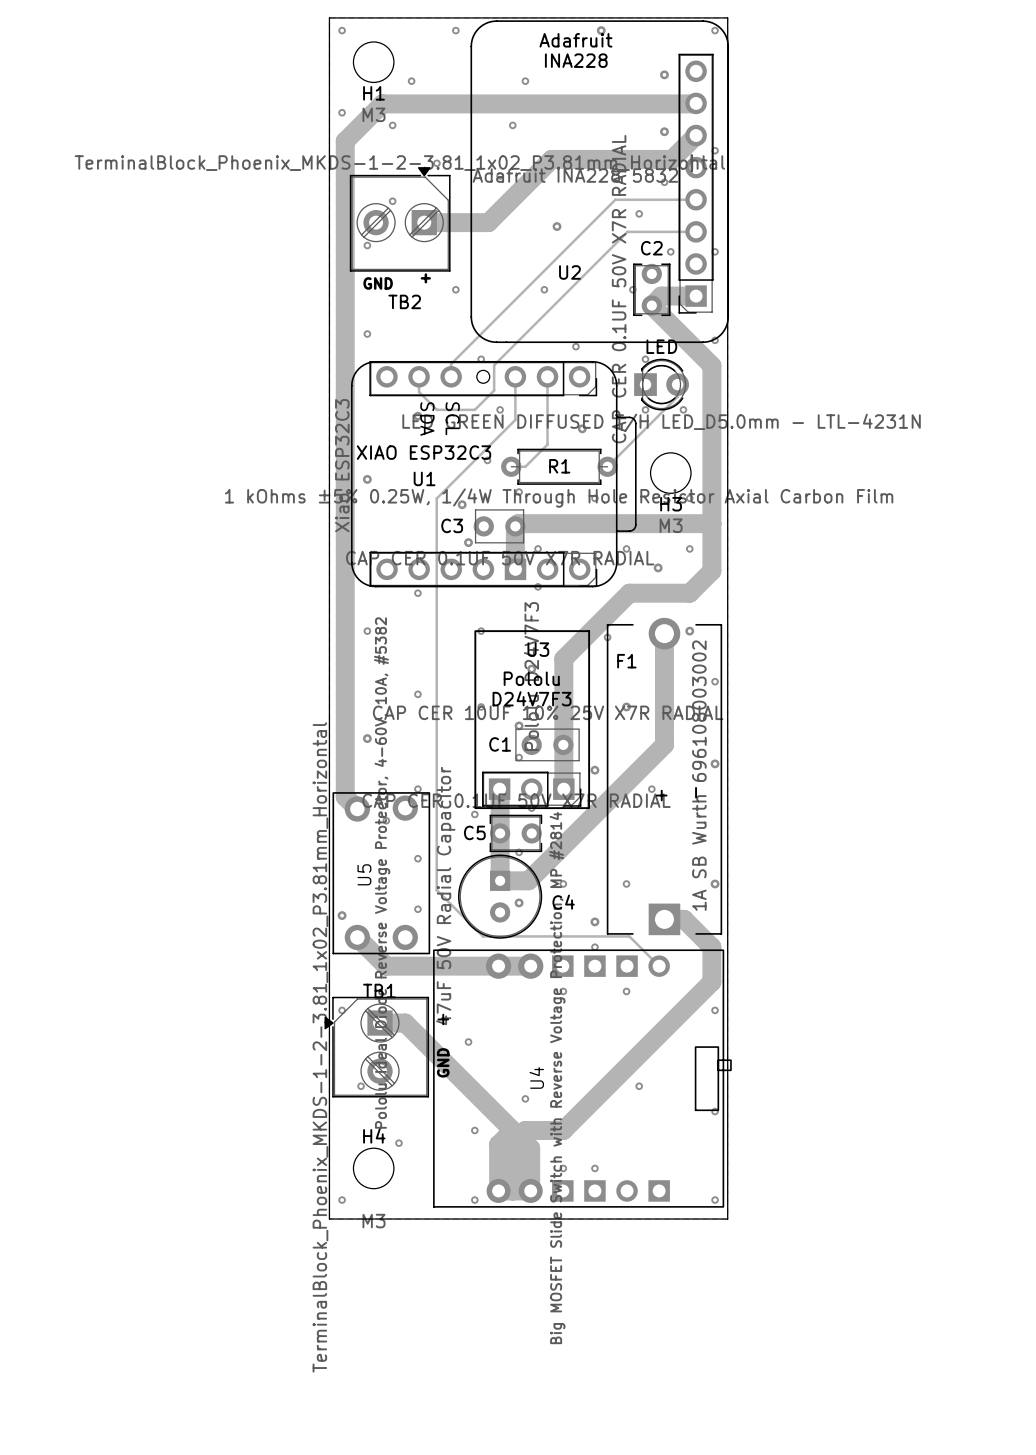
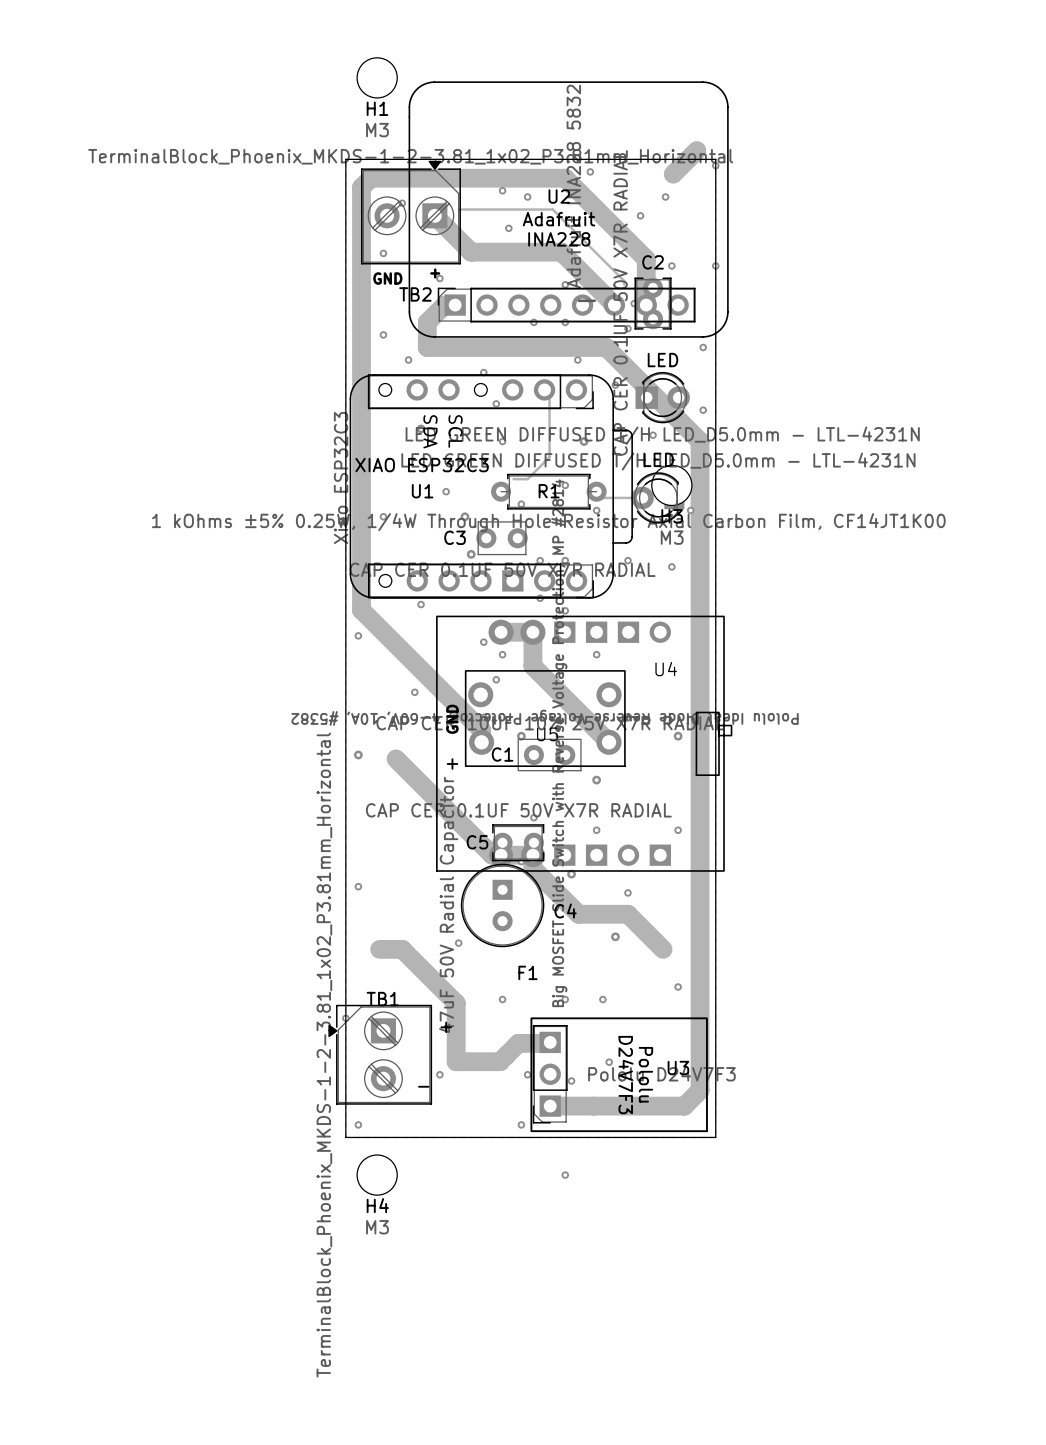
board edge: (329, 17) (727, 17) (727, 1219) (329, 1219) (329, 17) -> (345, 159) (345, 1137) (715, 1137) (715, 159) (345, 159)
via: (342, 30) -> none
via: (455, 30) -> none
via: (601, 30) -> none
via: (715, 30) -> none
text position: Adafruit (575, 40) -> Adafruit (559, 219)
text position: INA228 (576, 60) -> INA228 (559, 239)
via: (664, 74) -> none
via: (411, 81) -> none
via: (525, 81) -> none
track: (695, 103) (382, 103) (345, 141) (345, 796) (357, 809) -> none
via: (342, 112) -> none
via: (392, 125) -> none
via: (512, 125) -> none
via: (664, 131) -> none
via: none -> (590, 171)
track: (672, 159) (551, 159) (488, 222) (424, 222) -> none
via: (436, 163) -> none
U2 rotation: 0° (599, 181) -> 90° clockwise (568, 209)
via: none -> (527, 197)
track: none -> (458, 209) (552, 209) (624, 281) (624, 284)
track: (696, 199) (615, 199) (451, 364) (451, 376) -> none
via position: (392, 201) -> (402, 203)
track: none -> (434, 215) (471, 252) (561, 252) (614, 305)
via: none -> (508, 228)
via position: (639, 213) -> (640, 215)
TB2 position: (400, 219) -> (410, 212)
via: (557, 226) -> none
track: (696, 231) (627, 231) (494, 365) (494, 390) (474, 409) (436, 409) (419, 392) (419, 376) -> none
via position: (367, 245) -> (383, 253)
via: none -> (565, 284)
U2 name position: U2 (569, 272) -> U2 (559, 196)
text position: + (425, 278) -> + (435, 273)
text position: GND (378, 283) -> GND (387, 278)
via position: (455, 289) -> (439, 278)
via: (544, 289) -> none
track: none -> (455, 305) (444, 305) (427, 322) (427, 347) (606, 347) (700, 441) (700, 1090) (684, 1106) (550, 1106)
track: none -> (646, 305) (646, 259) (565, 178) (370, 178) (361, 187) (361, 610) (481, 730) (481, 742)
track: (696, 296) (661, 296) (651, 305) (711, 365) (711, 571) (689, 593) (629, 593) (563, 658) (563, 789) -> none
via: none -> (533, 322)
via: none -> (565, 322)
via: none -> (627, 328)
via position: (367, 334) -> (383, 334)
via position: (715, 340) -> (703, 347)
via: none -> (408, 360)
via: (645, 359) -> none
U1 footprint: [350, 360, 637, 588] -> [349, 374, 633, 599]
via: none -> (615, 385)
track: (515, 376) (515, 419) (436, 498) (436, 890) (483, 936) (629, 936) (659, 966) -> none
track: (677, 384) (677, 396) (607, 466) -> none
via: none -> (496, 403)
via: none -> (703, 410)
via: (500, 409) -> none
via position: (645, 409) -> (653, 435)
via: (683, 409) -> none
via: none -> (502, 441)
via: (487, 460) -> none
R1 position: (559, 466) -> (548, 491)
via: none -> (565, 485)
via: (367, 479) -> none
via: none -> (446, 491)
track: none -> (596, 491) (602, 497) (642, 497)
LED: none -> LED GREEN DIFFUSED T/H LED_D5.0mm - LTL-4231N (657, 497)
R1 value: 1 kOhms ±5% 0.25W, 1/4W Through Hole Resistor Axial Carbon Film (559, 498) -> 1 kOhms ±5% 0.25W, 1/4W Through Hole Resistor Axial Carbon Film, CF14JT1K00 (548, 522)
via: none -> (383, 516)
track: (711, 523) (518, 523) (515, 526) (515, 569) -> none
via: none -> (565, 560)
via position: (689, 548) -> (671, 566)
via: (658, 567) -> none
via: none -> (565, 610)
track: none -> (501, 632) (532, 632) (532, 666) (609, 742)
via position: (367, 631) -> (358, 635)
via: (689, 631) -> none
track: (664, 633) (664, 744) (528, 880) (500, 880) (500, 789) -> none
via position: (607, 637) -> (596, 654)
via: none -> (502, 654)
text: F1 (626, 661) -> none
via: none -> (496, 679)
via: (531, 669) -> none
text: Pololu (531, 678) -> none
via: (715, 681) -> none
via position: (417, 694) -> (414, 692)
text: D24V7F3 (532, 698) -> none
text: none -> GND (452, 719)
U3 rotation: 0° (532, 719) -> 90° clockwise (619, 1074)
U3 position: (532, 719) -> (619, 1074)
via: none -> (678, 736)
via position: (367, 738) -> (358, 755)
track: none -> (395, 758) (492, 855) (532, 855) (532, 868) (578, 914) (627, 914) (663, 949)
text: none -> + (452, 764)
via: (519, 757) -> none
via: (715, 763) -> none
part: 1A SB Wurth 696108003002 (664, 776) -> none
via: (417, 789) -> none
via: (651, 789) -> none
text: - (696, 792) -> none
text: + (661, 795) -> none
via: (474, 814) -> none
via: (386, 820) -> none
via: none -> (596, 830)
via: none -> (678, 830)
via: (417, 858) -> none
via: none -> (571, 874)
U5 rotation: 0° (381, 873) -> 90° counterclockwise (545, 718)
U5 position: (381, 873) -> (545, 718)
via: none -> (358, 886)
via: (563, 883) -> none
via: (715, 883) -> none
via: (519, 902) -> none
via: (417, 909) -> none
via: (342, 915) -> none
track: (664, 919) (684, 919) (711, 947) (711, 981) (563, 1130) (525, 1130) (519, 1136) -> none
via position: (594, 921) -> (615, 936)
via: none -> (458, 943)
track: (357, 937) (386, 966) (530, 966) -> none
track: none -> (379, 949) (402, 949) (456, 1003) (456, 1061) (500, 1061) (518, 1043) (549, 1043)
via: (594, 947) -> none
text: none -> F1 (527, 972)
via: none -> (678, 986)
via: none -> (502, 999)
via: none -> (602, 999)
via: (626, 991) -> none
via: (715, 1010) -> none
track: (380, 1023) (405, 1023) (530, 1148) (530, 1190) (498, 1190) (498, 1144) (512, 1130) (512, 1190) -> none
via: (468, 1042) -> none
via: none -> (609, 1062)
text: GND (443, 1062) -> none
via: none -> (439, 1074)
via: none -> (527, 1074)
text: none -> D24V7F3 (626, 1075)
text: none -> Pololu (645, 1074)
via: none -> (571, 1081)
U4 name rotation: 0° (536, 1077) -> 90° clockwise (666, 669)
U4 name position: U4 (536, 1077) -> U4 (666, 669)
U4 position: (582, 1078) -> (584, 743)
text: none -> - (423, 1086)
via: (361, 1086) -> none
via: (639, 1086) -> none
via: (525, 1098) -> none
via: (715, 1111) -> none
via: none -> (358, 1124)
via: none -> (521, 1124)
via: (474, 1130) -> none
H4 name position: H4 (374, 1136) -> H4 (377, 1205)
via: (398, 1143) -> none
via: (594, 1168) -> none
via: (342, 1200) -> none
via: (474, 1200) -> none
via: (715, 1200) -> none

